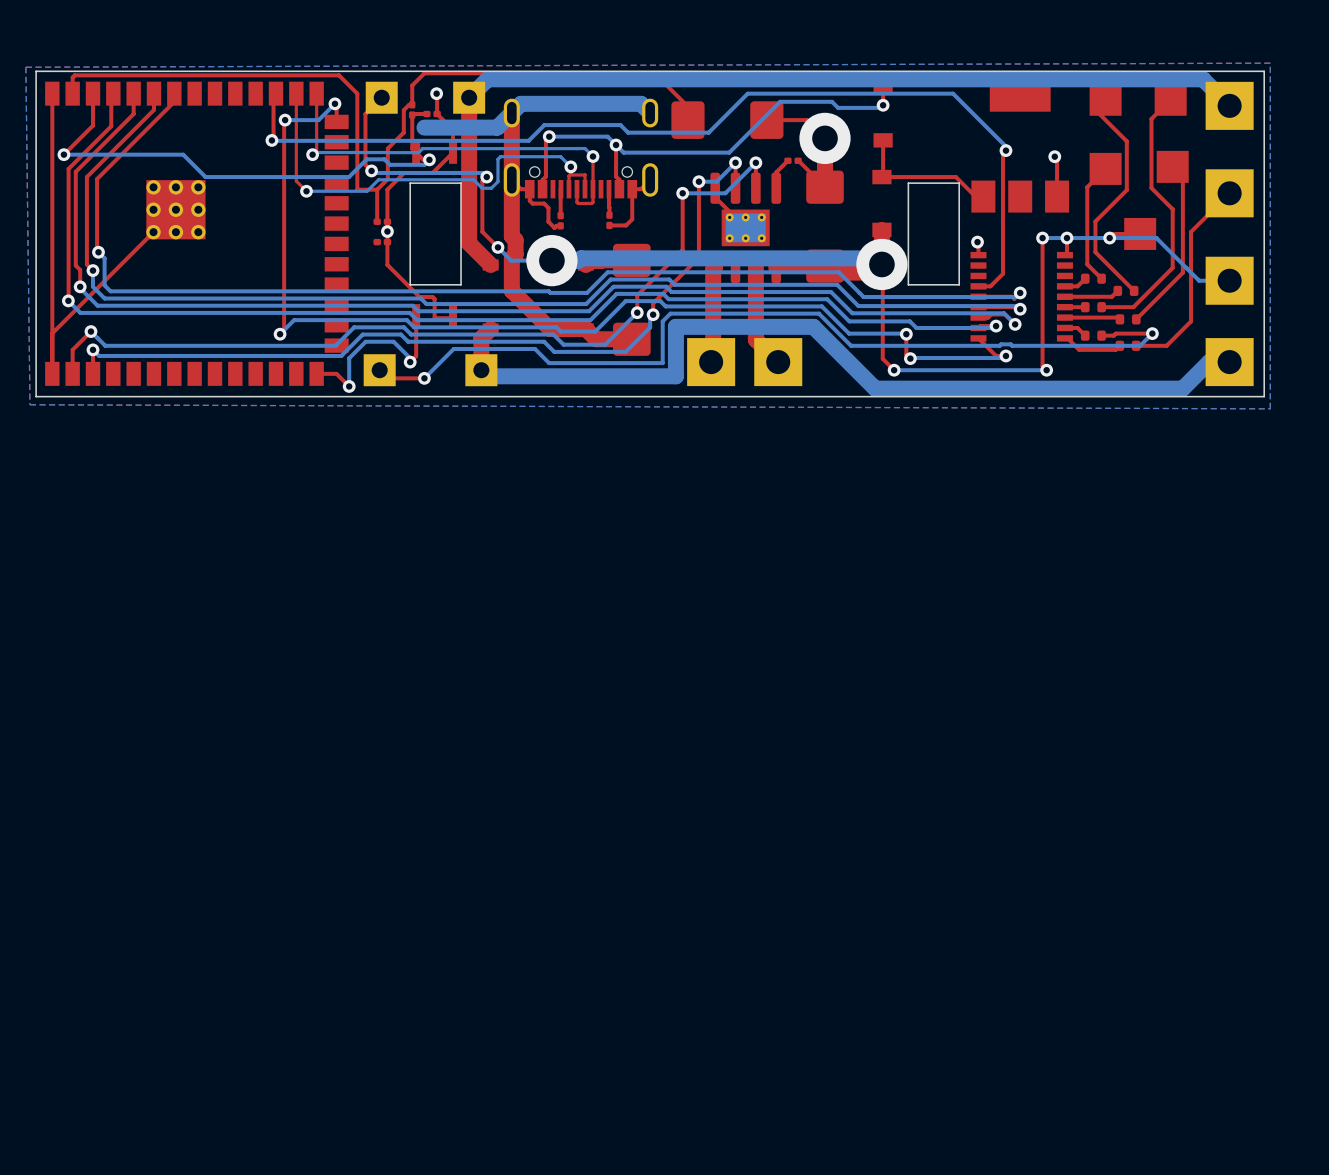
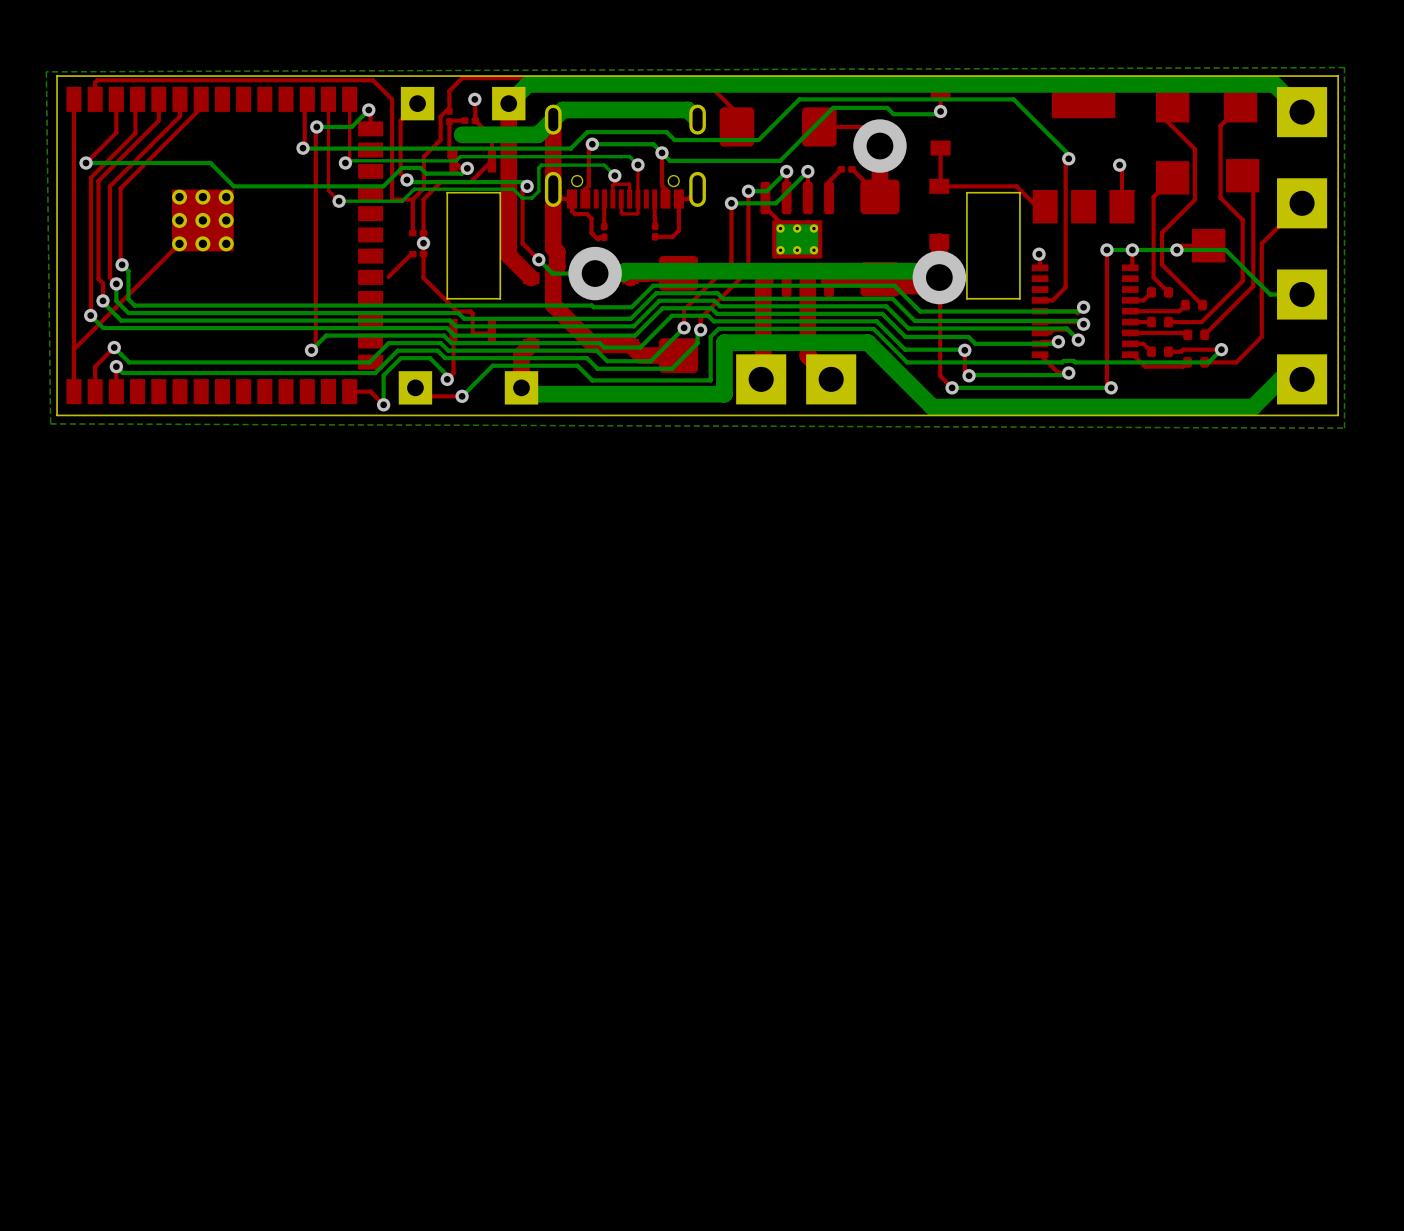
top track: none -> (411, 254) (388, 276)

